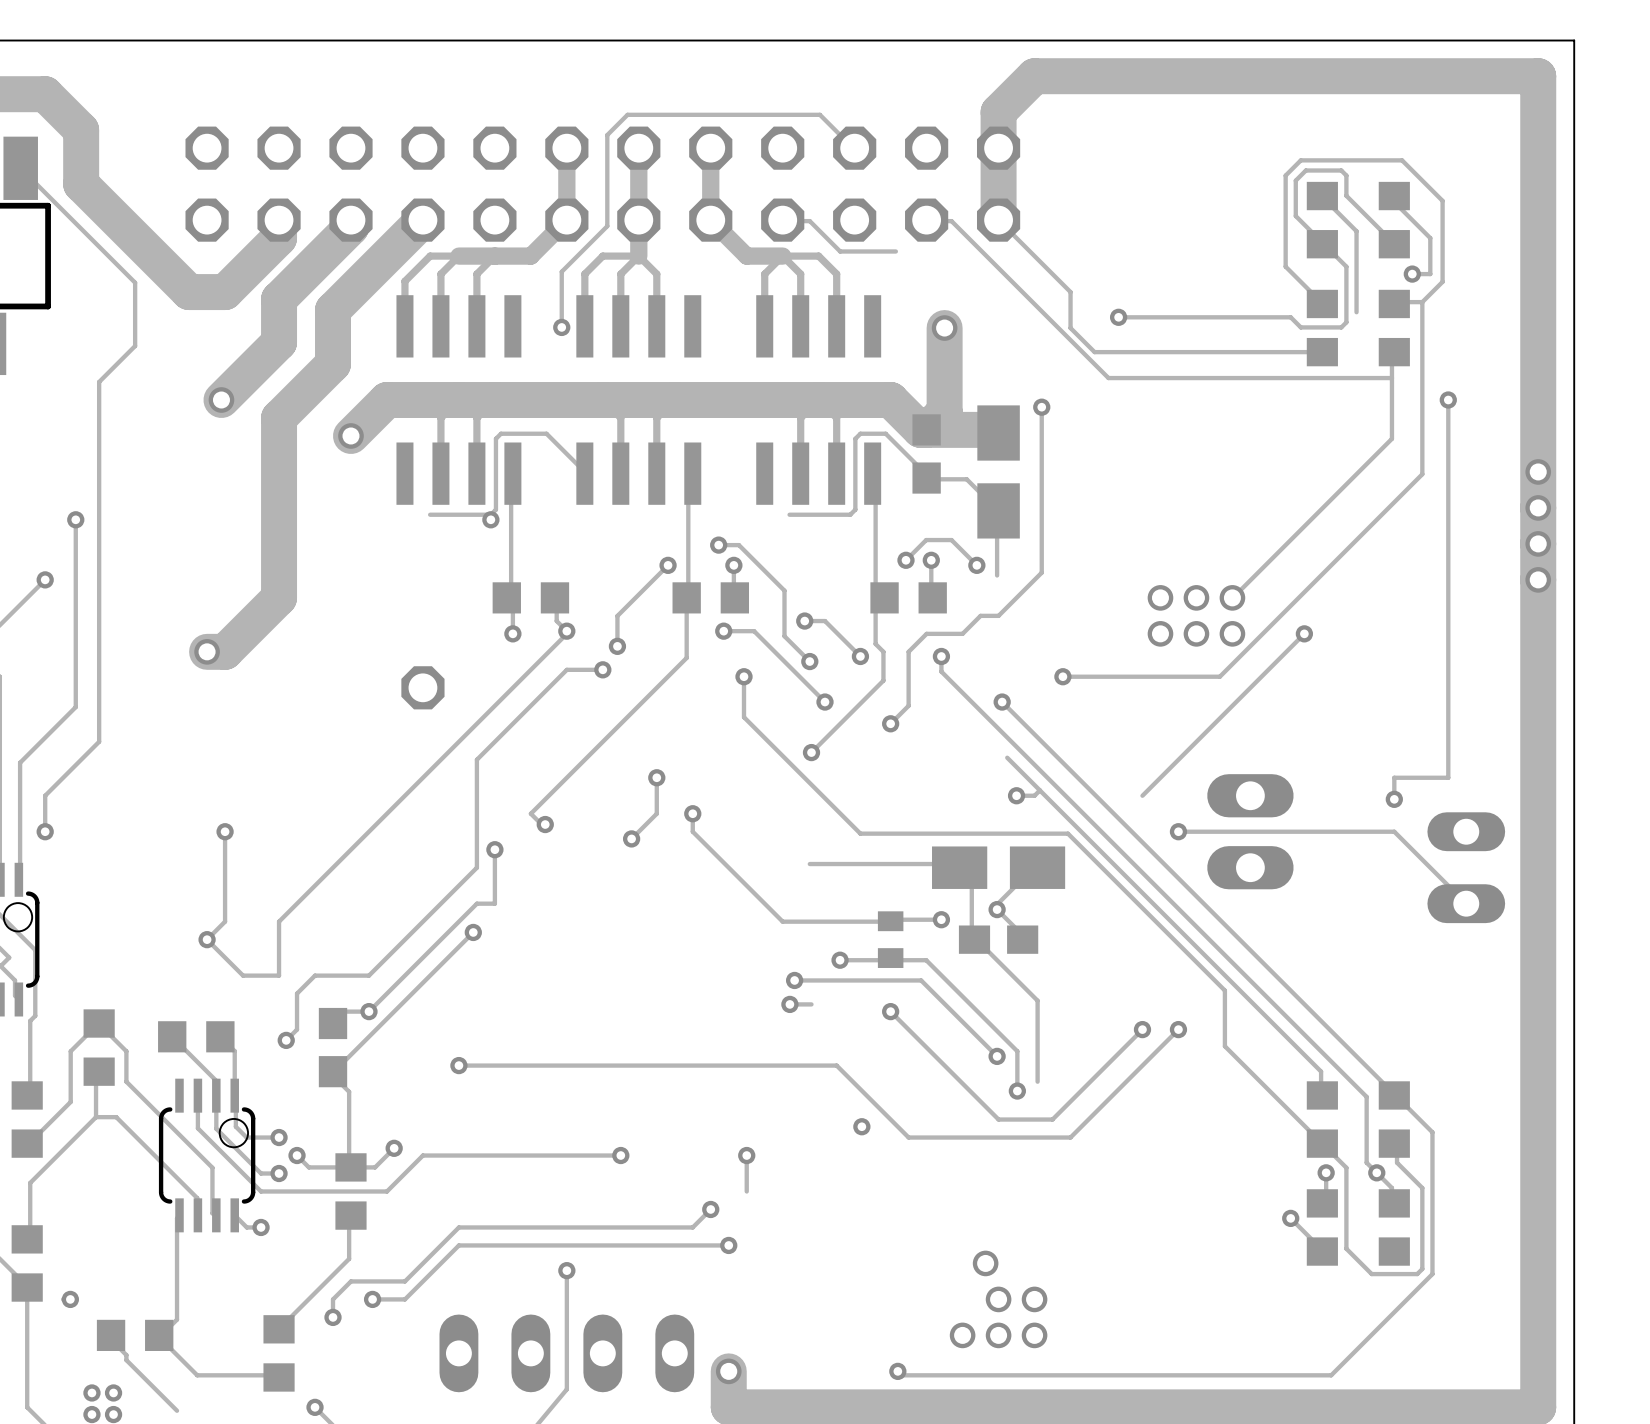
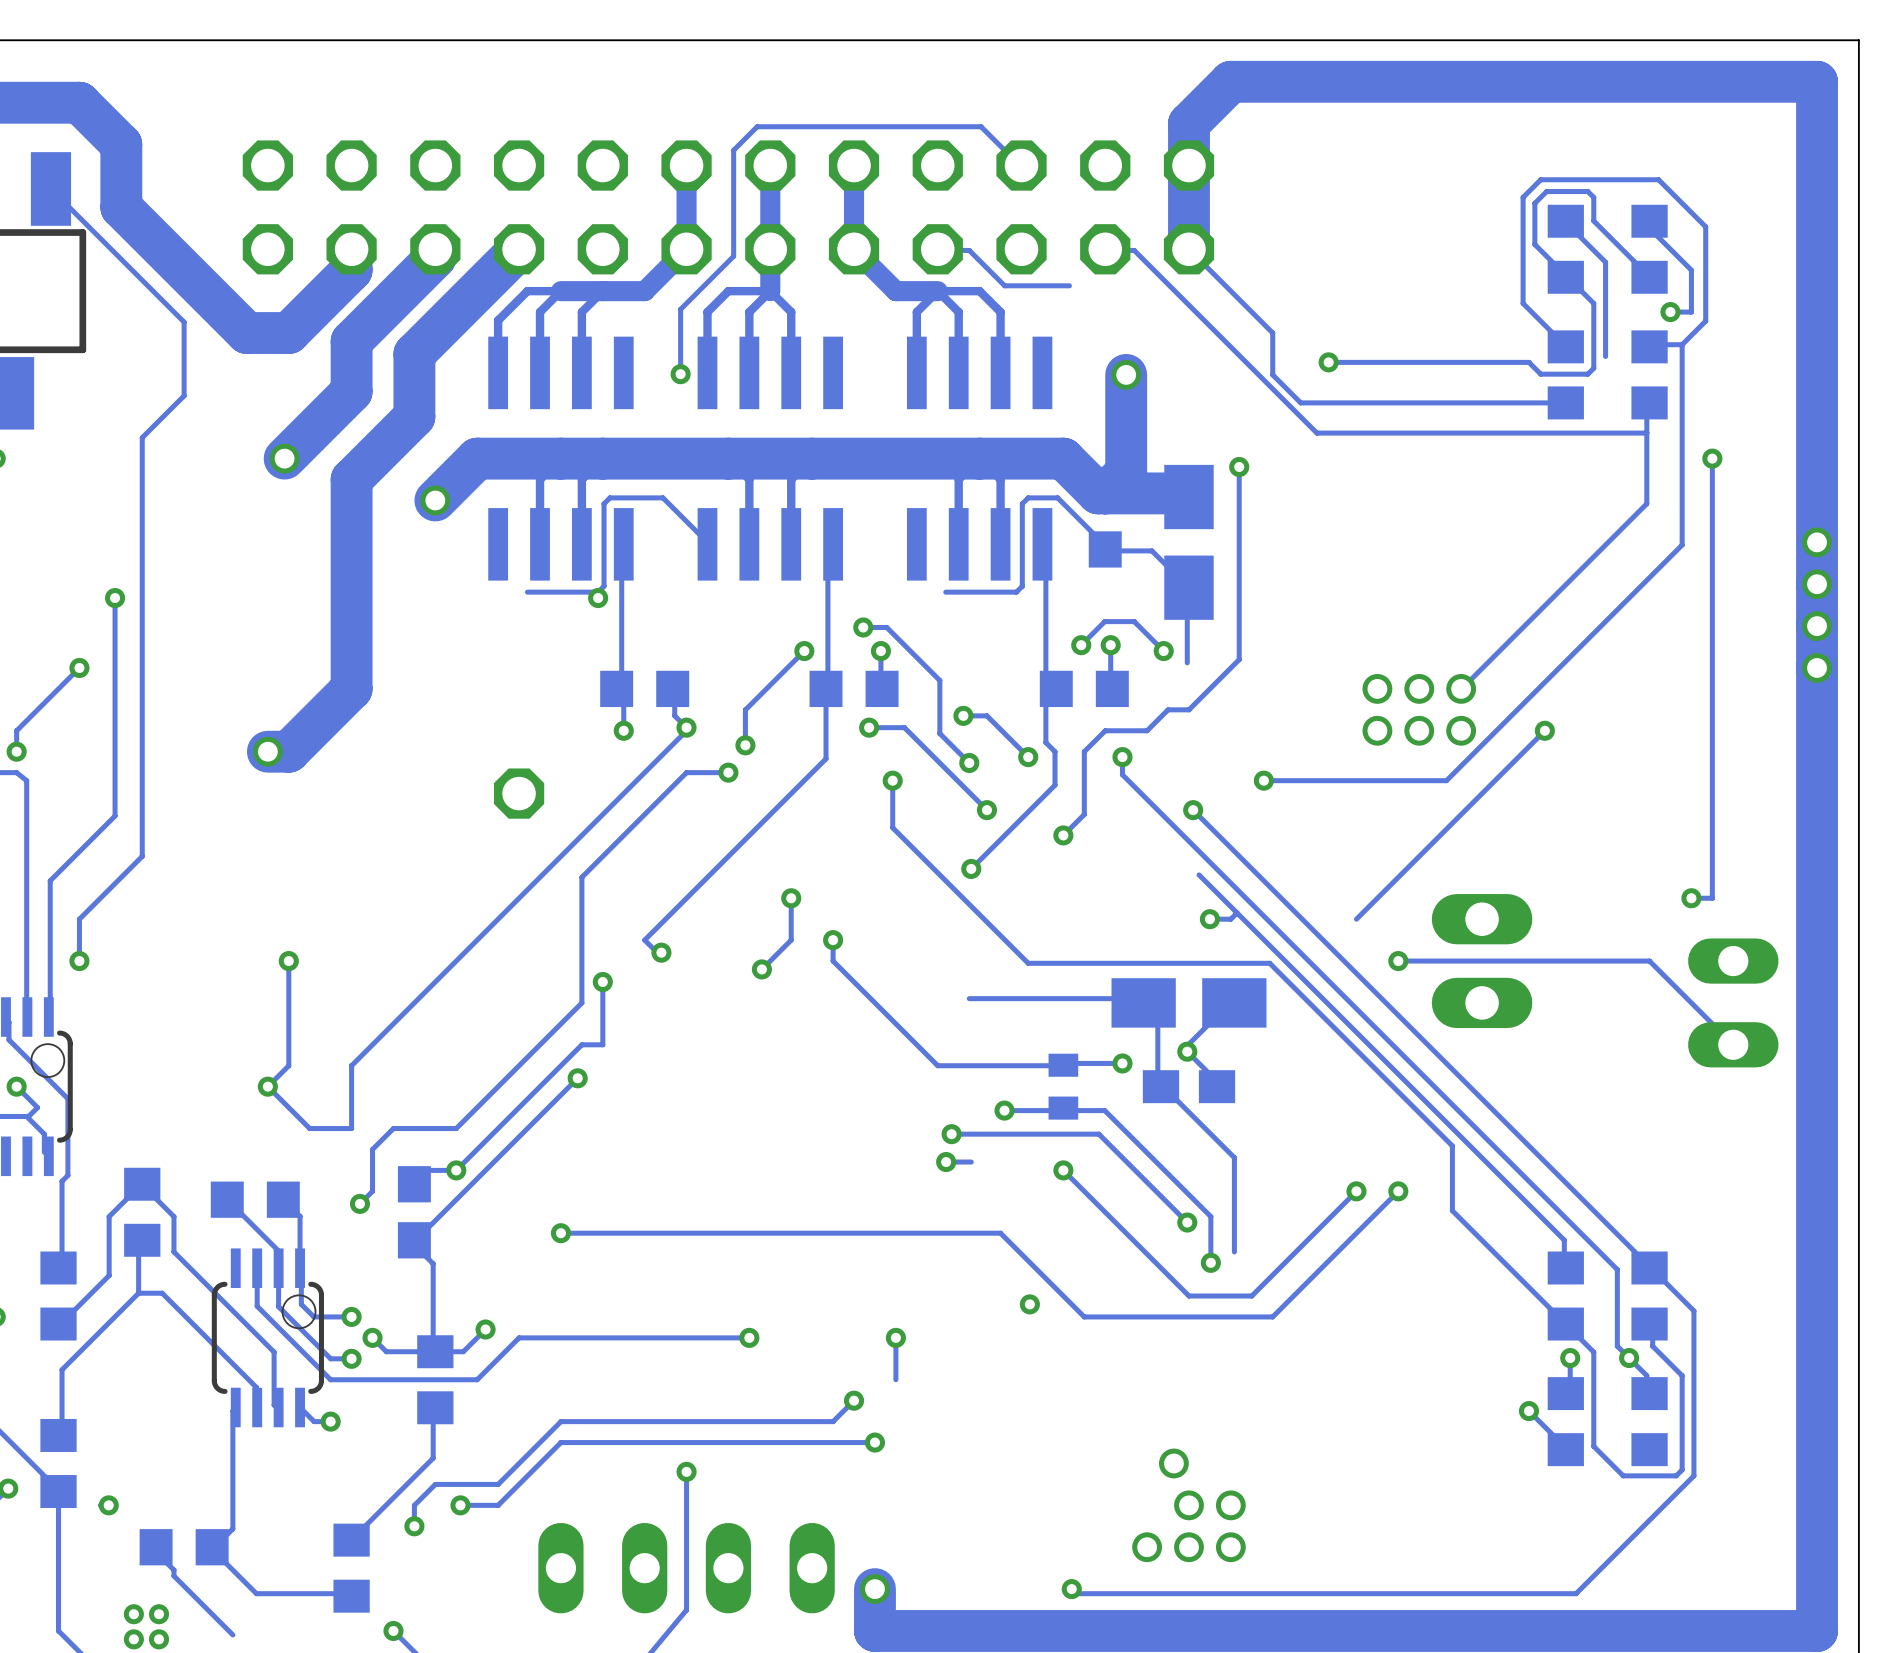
track: (1430, 777) (1394, 777) (1394, 799) -> none
via position: (1394, 799) -> (1691, 898)

